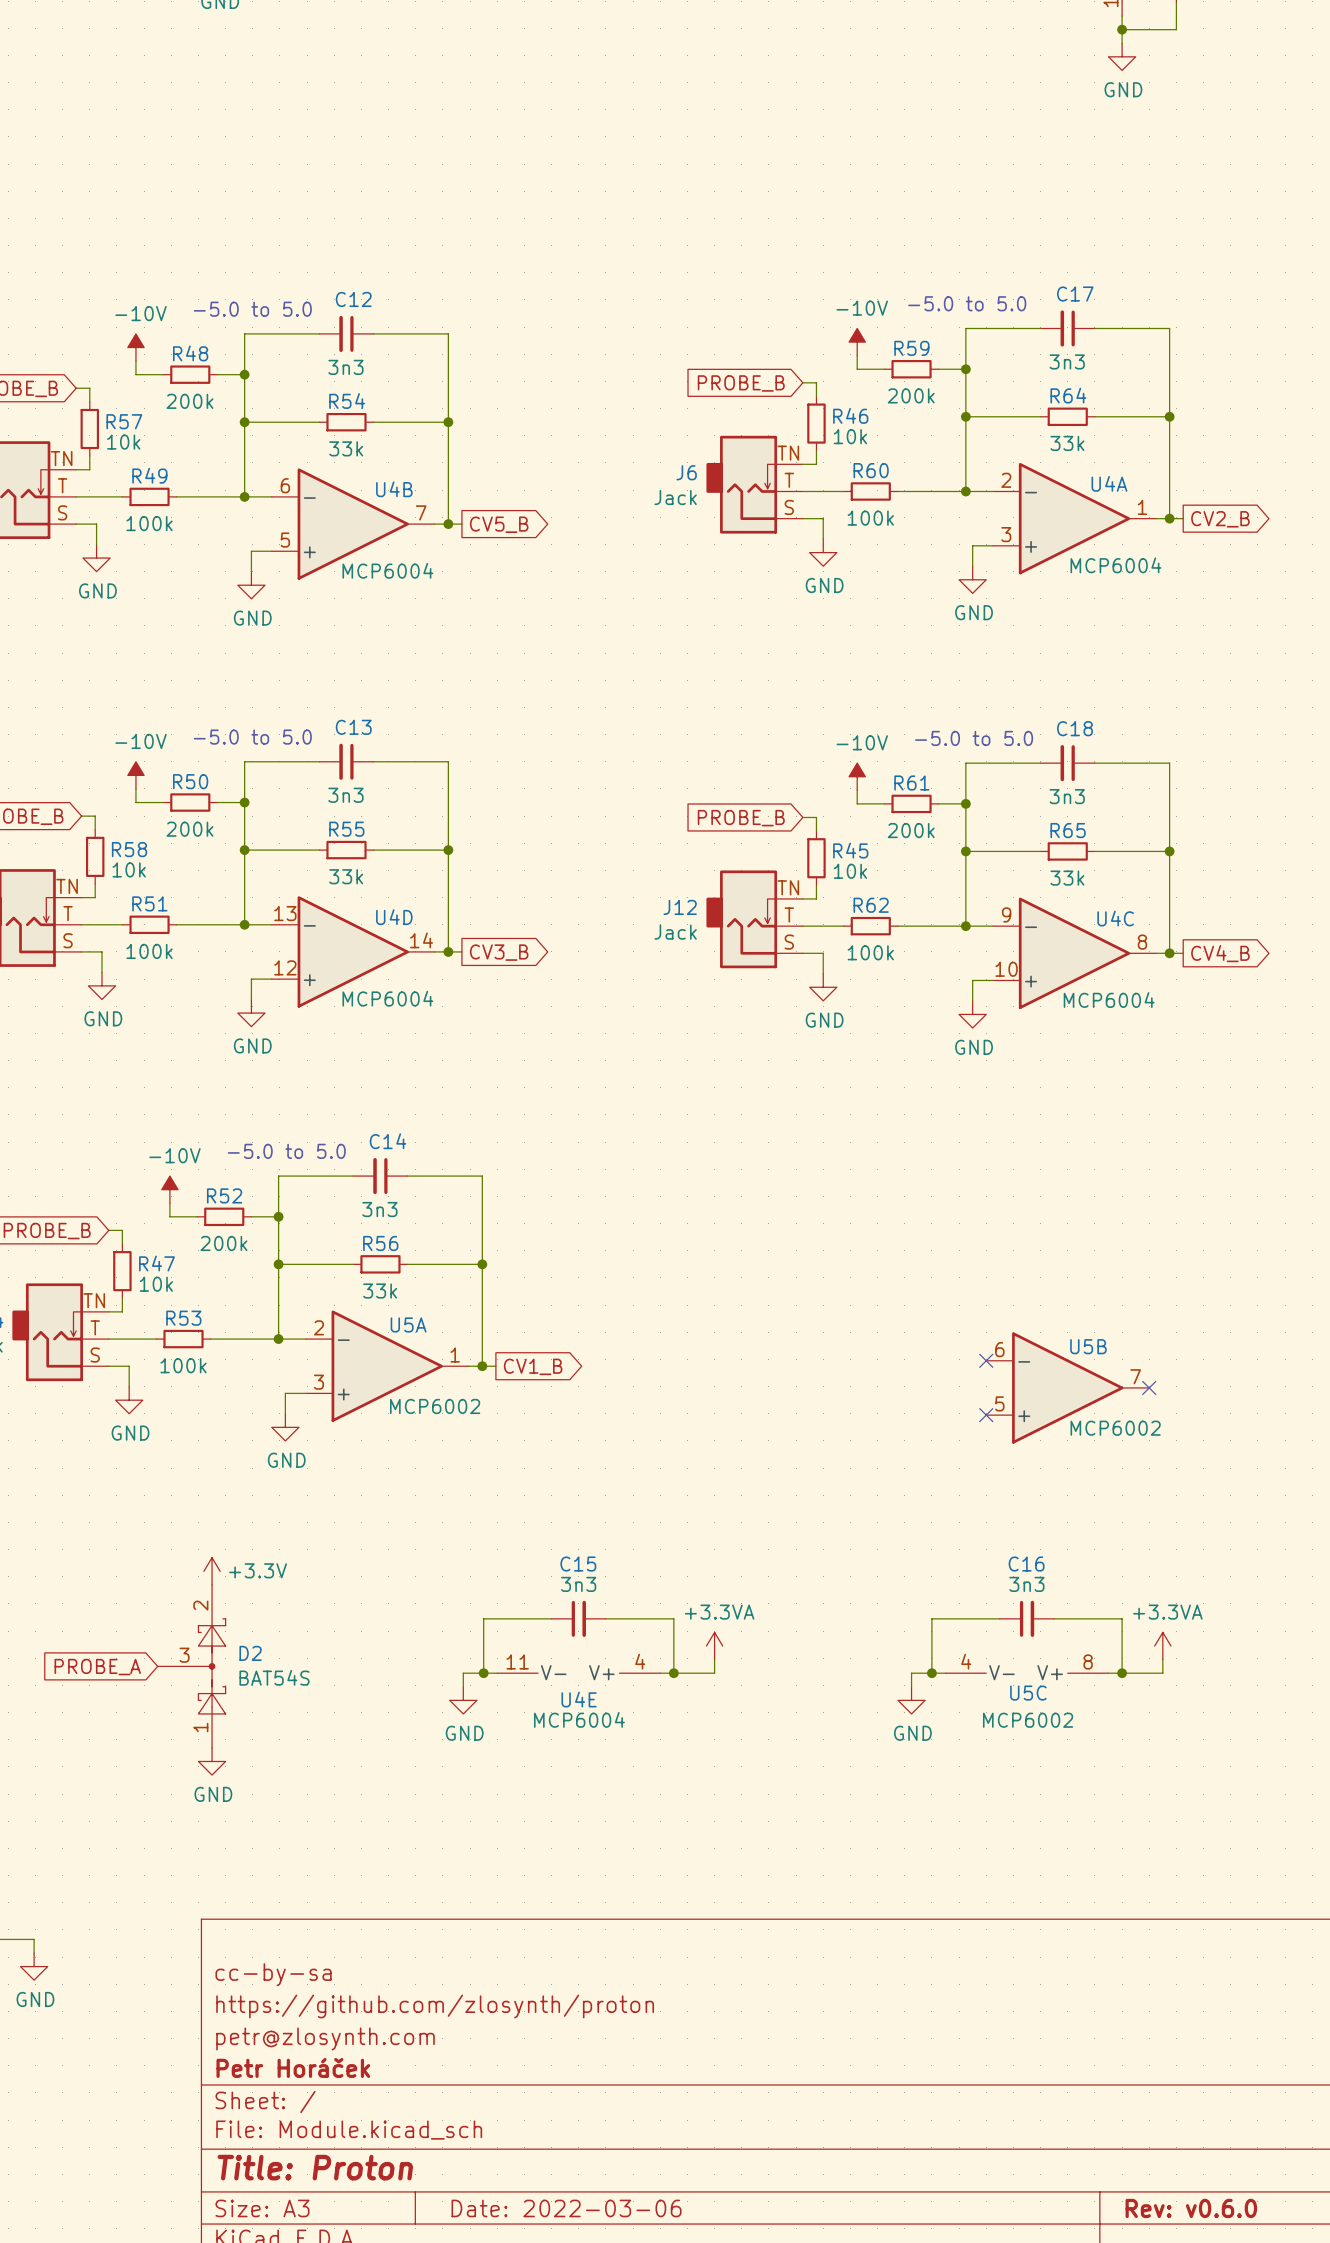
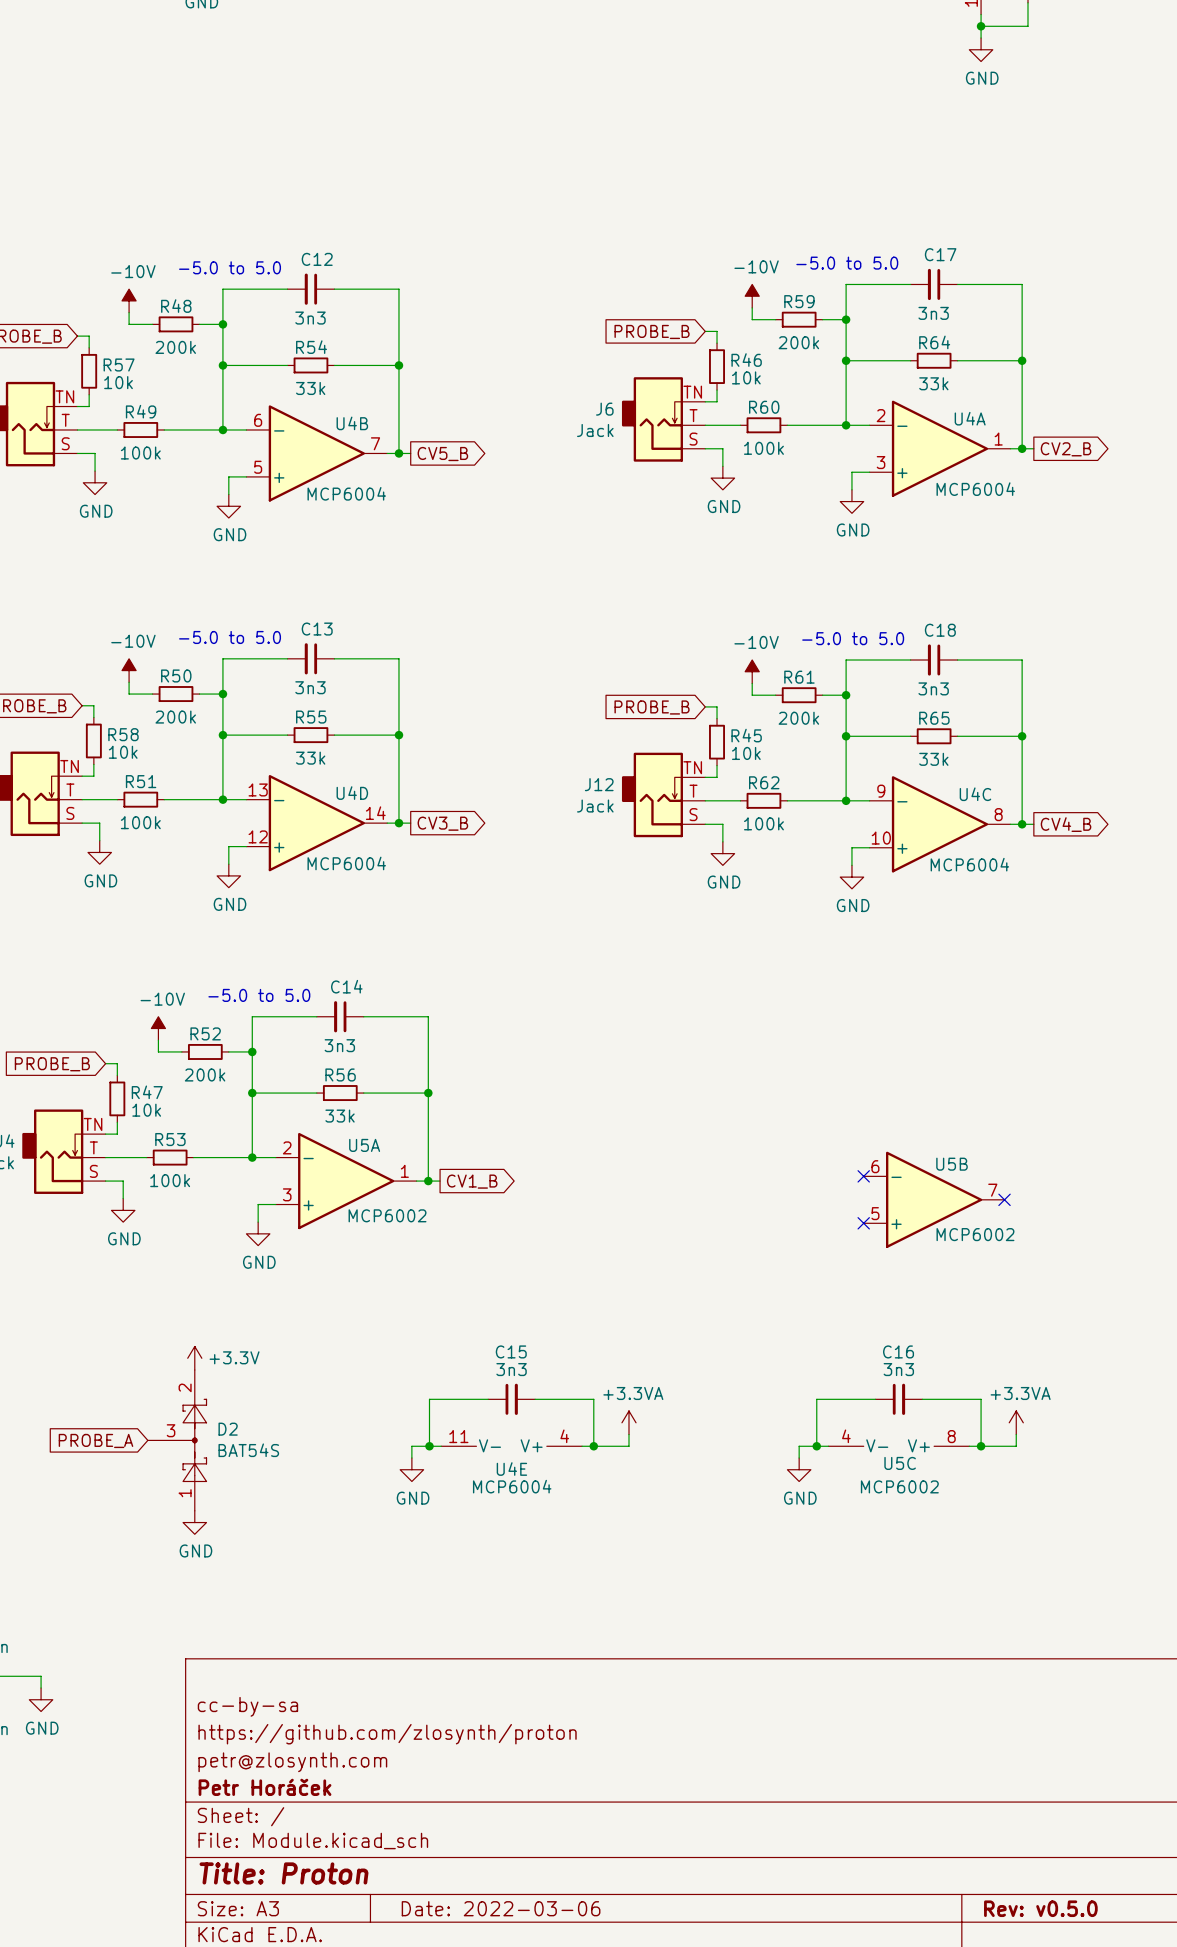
title block: Rev: v0.6.0 (1191, 2208) -> Rev: v0.5.0 (1040, 1908)

